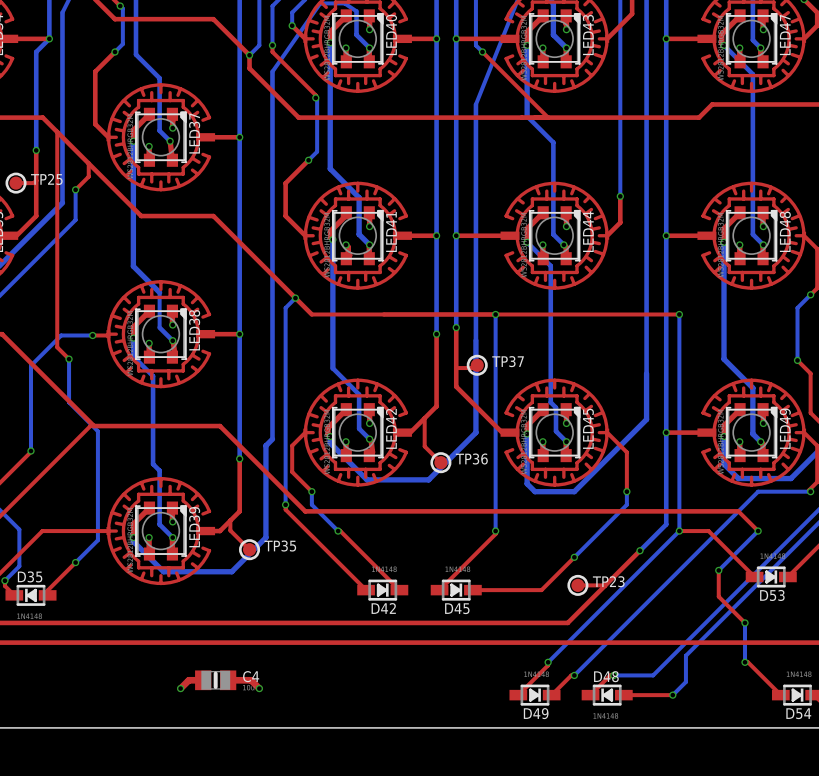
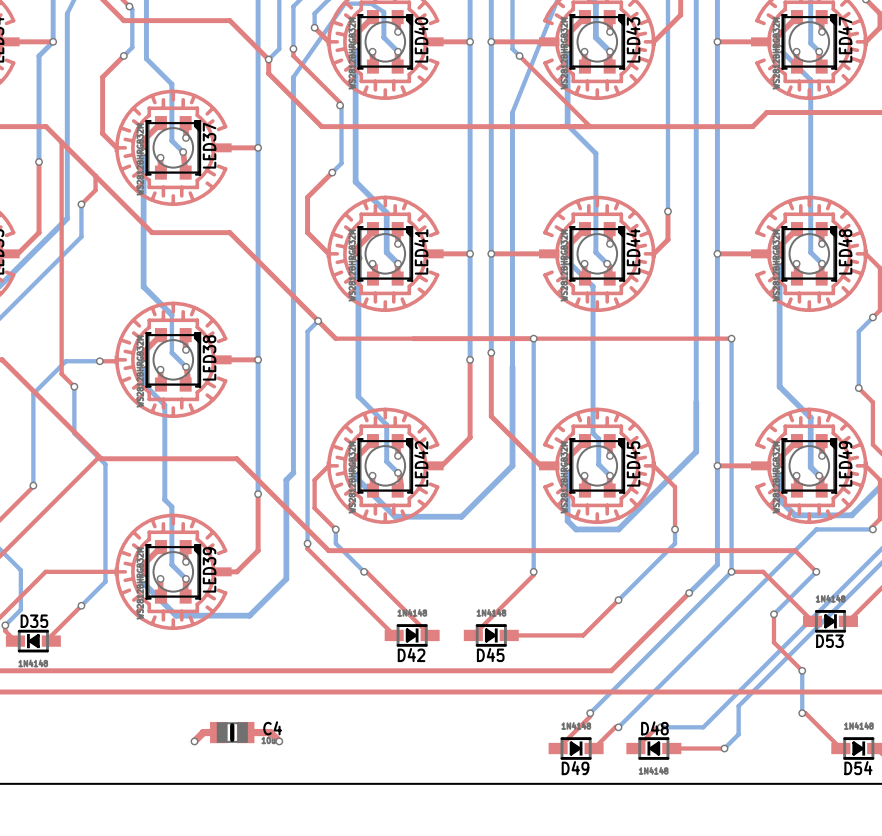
top track: (36, 180) (33, 183) (16, 183) -> none
TP25: (16, 183) -> none
top track: (477, 365) (477, 368) (456, 368) -> none
TP37: (477, 365) -> none
top track: (424, 418) (424, 446) (440, 462) -> none
TP36: (440, 462) -> none
top track: (230, 520) (230, 530) (249, 549) -> none
TP35: (249, 549) -> none
top track: (577, 585) (604, 585) -> none
TP23: (577, 585) -> none

